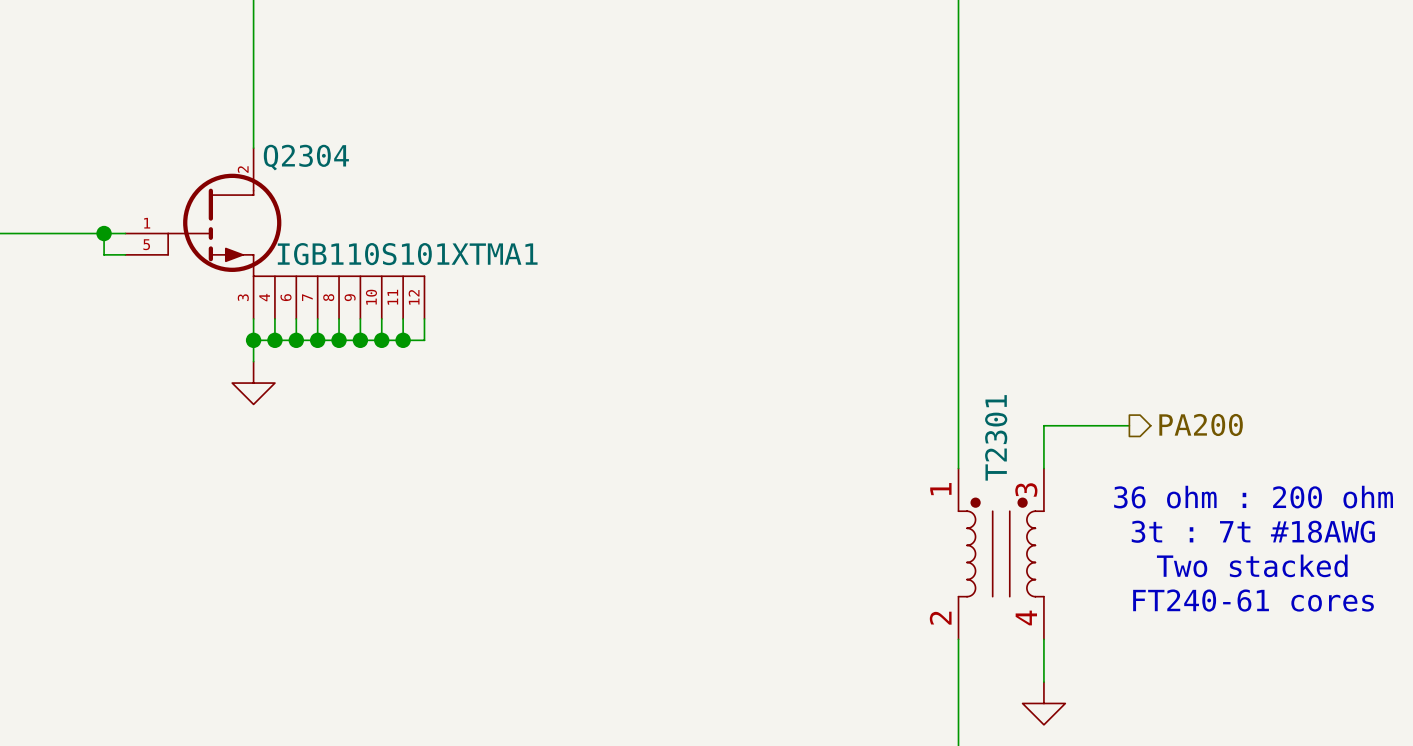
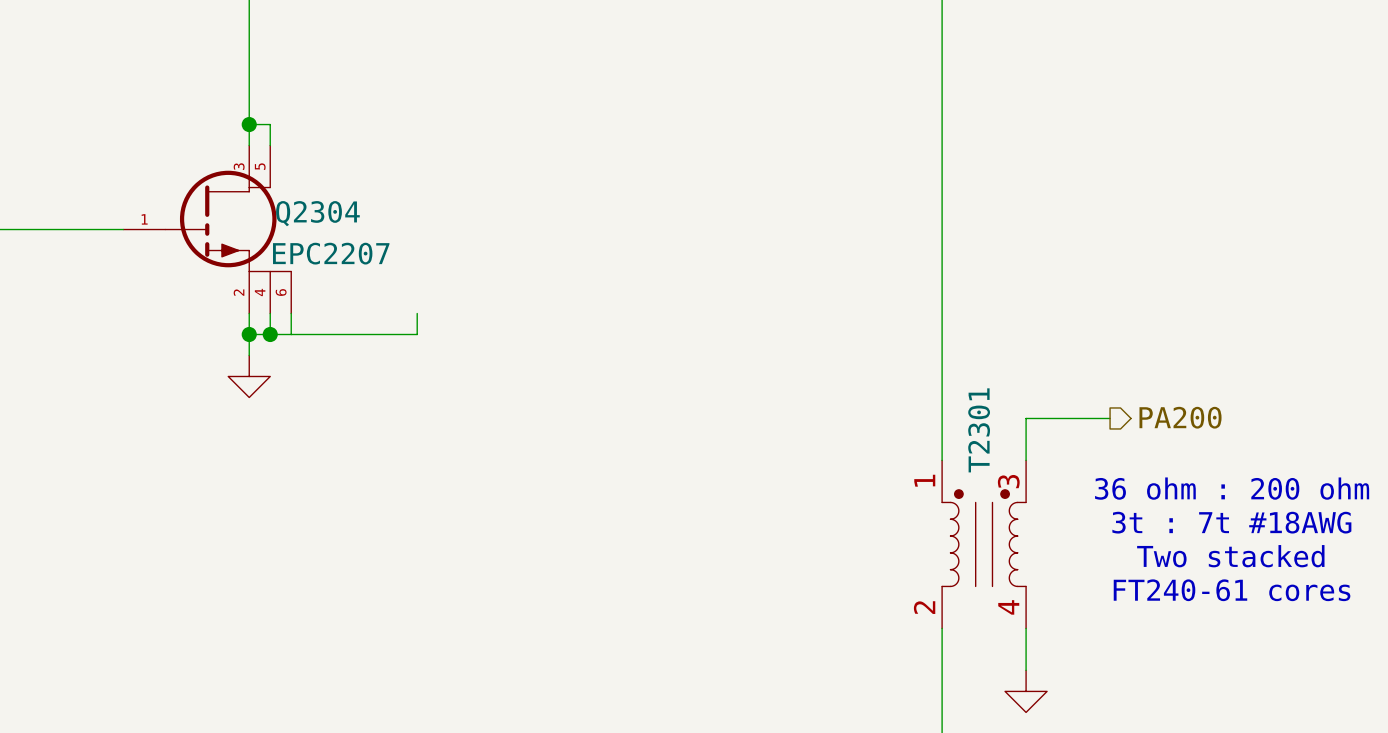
wire: none -> (249, 124) (270, 124) (270, 145)
junction: none -> (249, 124)
Q2304 symbol: [125, 148, 425, 319] -> [123, 145, 292, 314]
Q2304 name position: Q2304 (306, 157) -> Q2304 (317, 213)
wire: (104, 233) (104, 254) (125, 254) -> none
junction: (104, 233) -> none
Q2304 value: IGB110S101XTMA1 (407, 254) -> EPC2207 (331, 253)
wire: (317, 318) (317, 340) -> none
wire: (339, 318) (339, 340) -> none
wire: (360, 318) (360, 340) -> none
wire: (381, 318) (381, 340) -> none
wire: (403, 318) (403, 340) -> none
junction: (296, 340) -> none
junction: (317, 340) -> none
junction: (339, 340) -> none
junction: (360, 340) -> none
junction: (381, 340) -> none
junction: (403, 340) -> none

